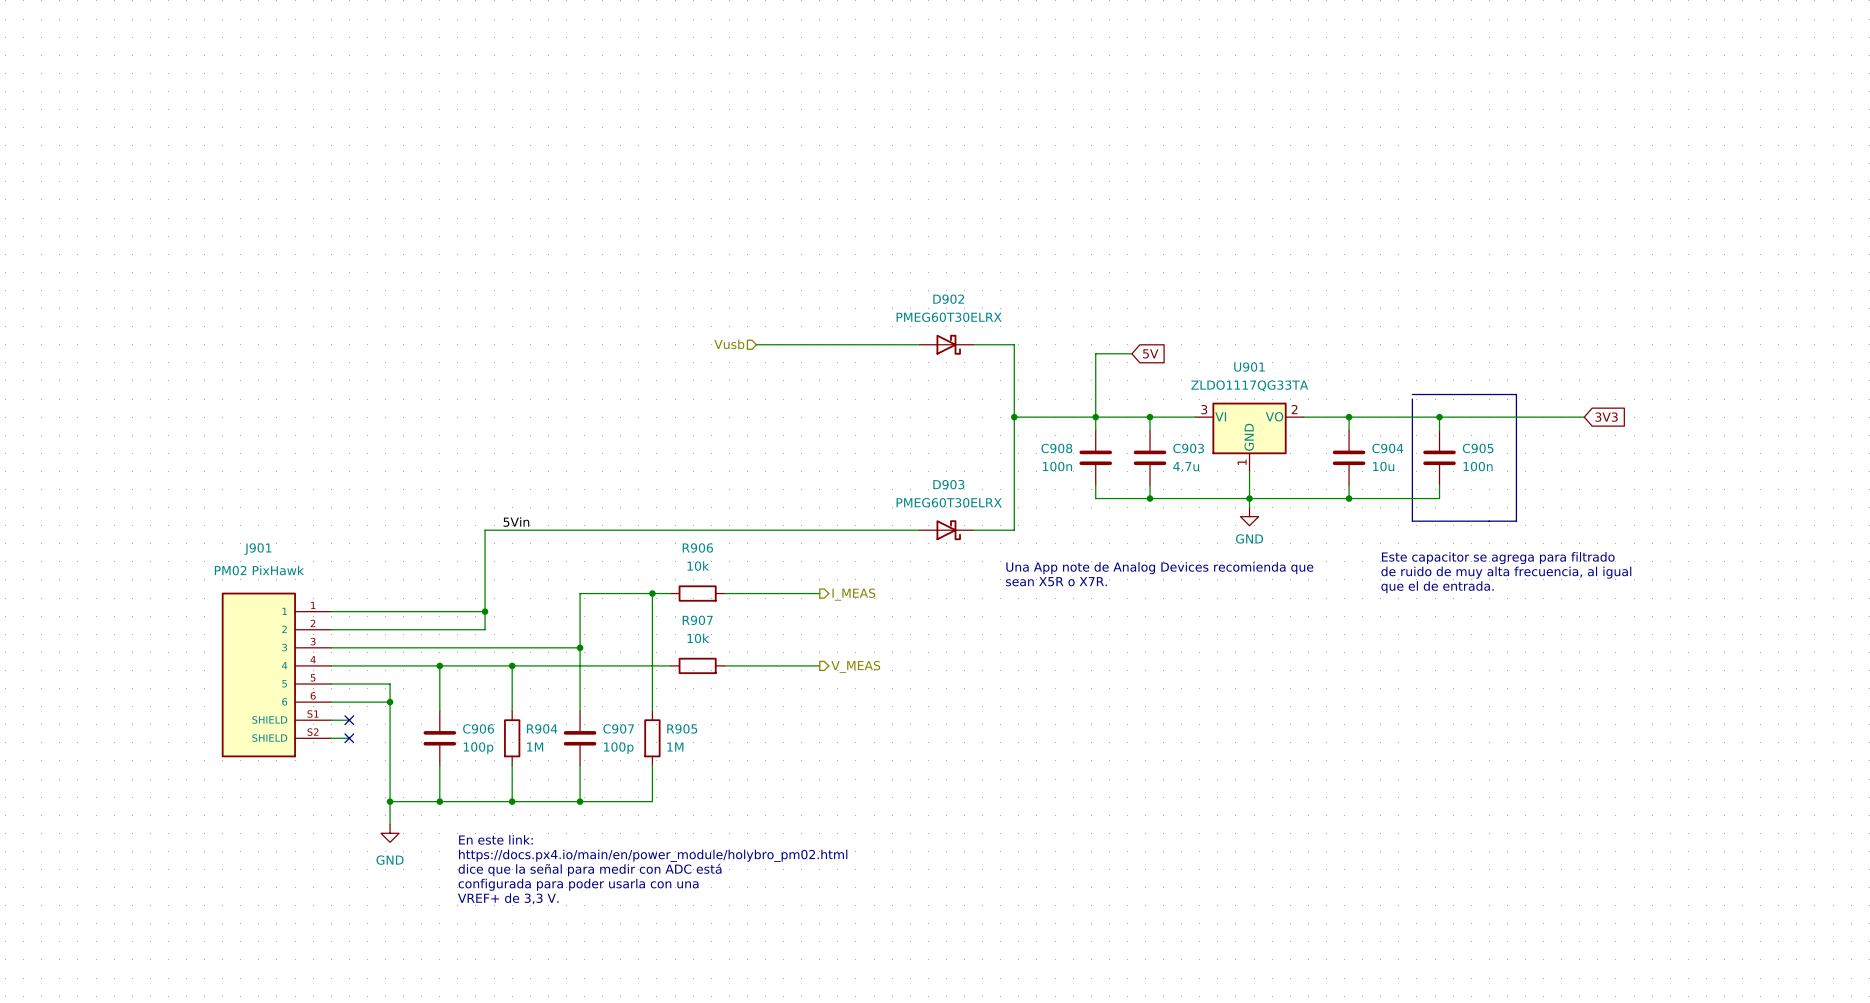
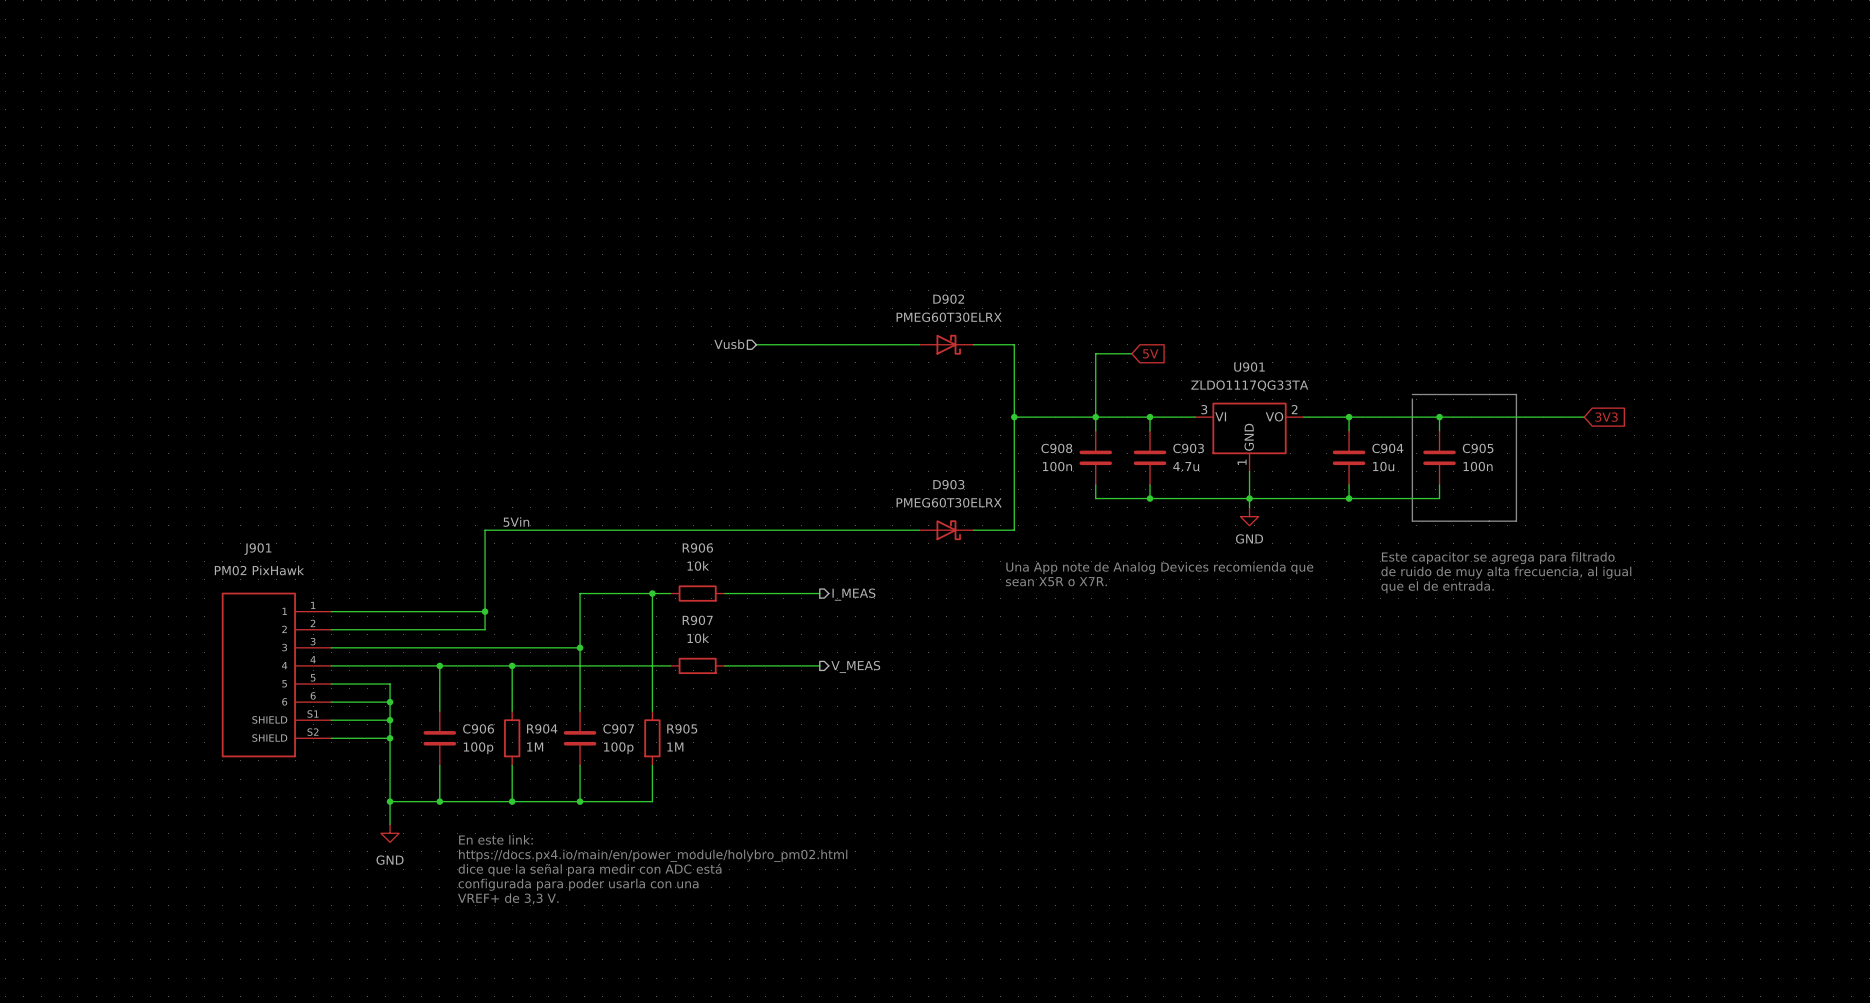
wire: none -> (349, 720) (390, 720)
no-connect mark: (349, 720) -> none
junction: none -> (390, 720)
wire: none -> (349, 738) (390, 738)
no-connect mark: (349, 738) -> none
junction: none -> (390, 738)

